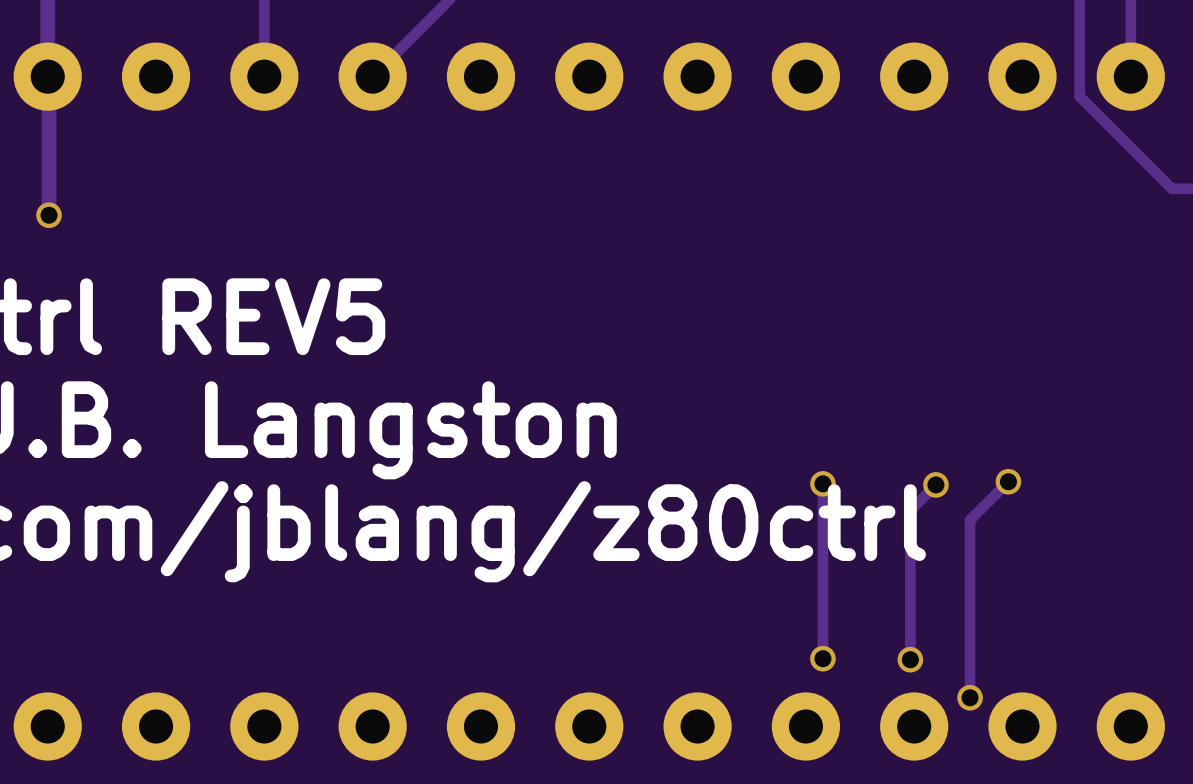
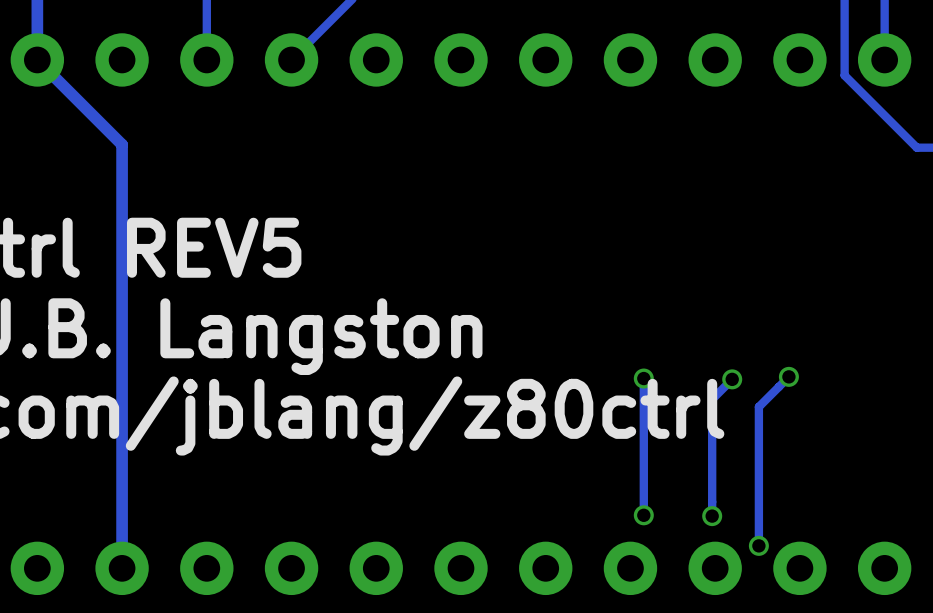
track: (49, 77) (49, 215) -> (38, 60) (122, 144) (122, 568)
via: (49, 215) -> none

